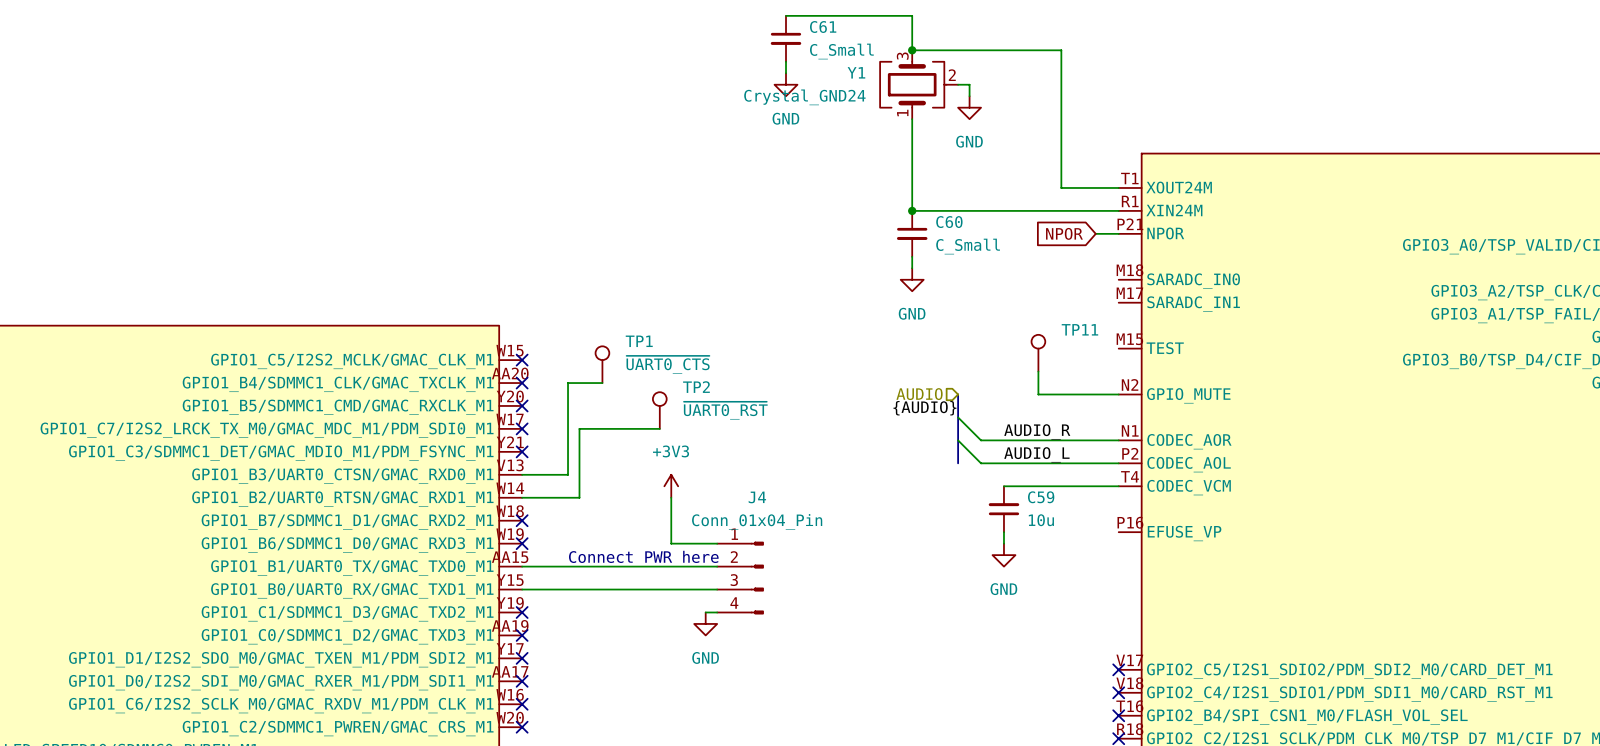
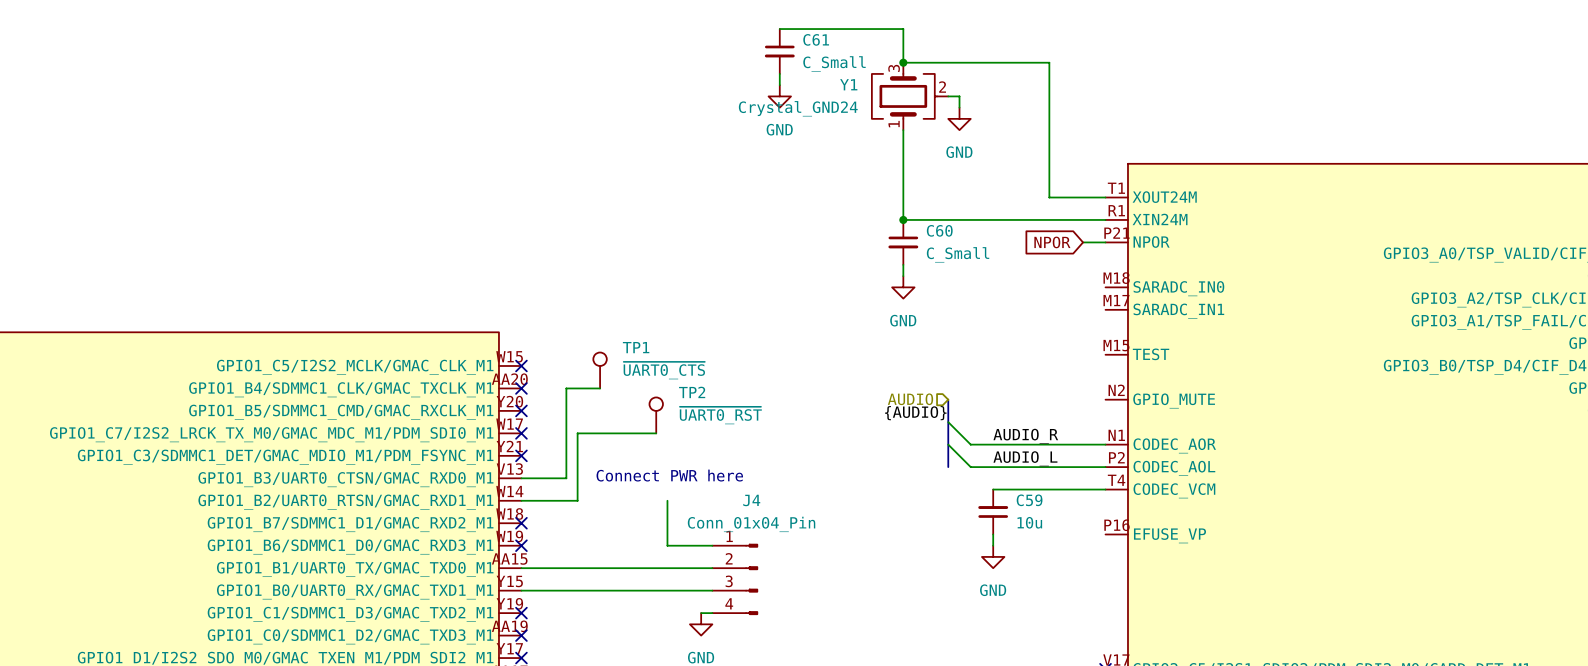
TP11: (1038, 353) -> none
wire: (1038, 371) (1038, 394) (1118, 394) -> none
power symbol: +3V3 (671, 486) -> none
text position: Connect PWR here (643, 556) -> Connect PWR here (669, 475)

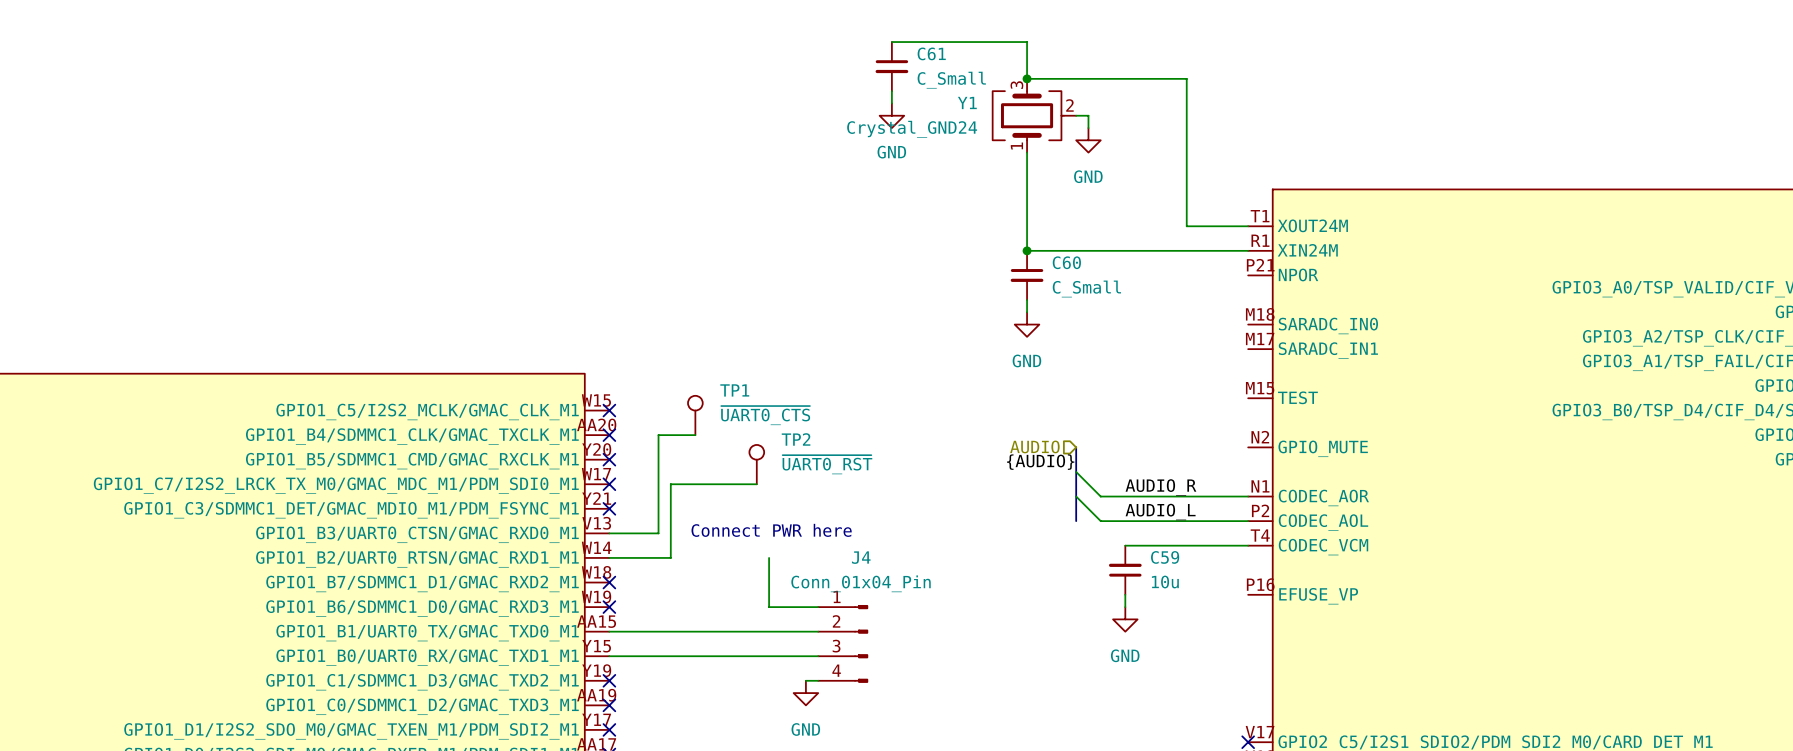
global label: NPOR (1052, 242) -> none
wire: (1083, 242) (1105, 242) -> none

